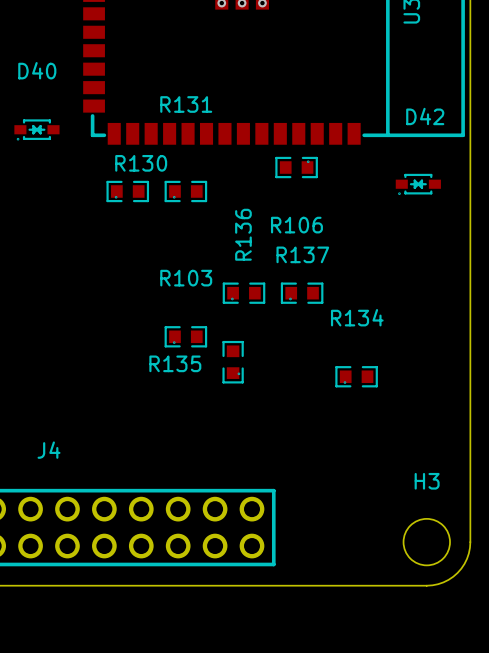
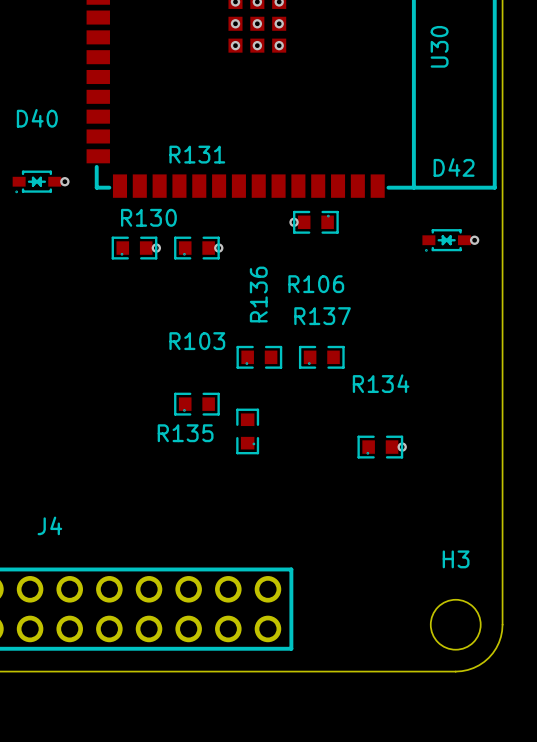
via: none -> (64, 181)
via: none -> (294, 222)
via: none -> (474, 240)
via: none -> (156, 248)
via: none -> (218, 248)
via: none -> (402, 447)

